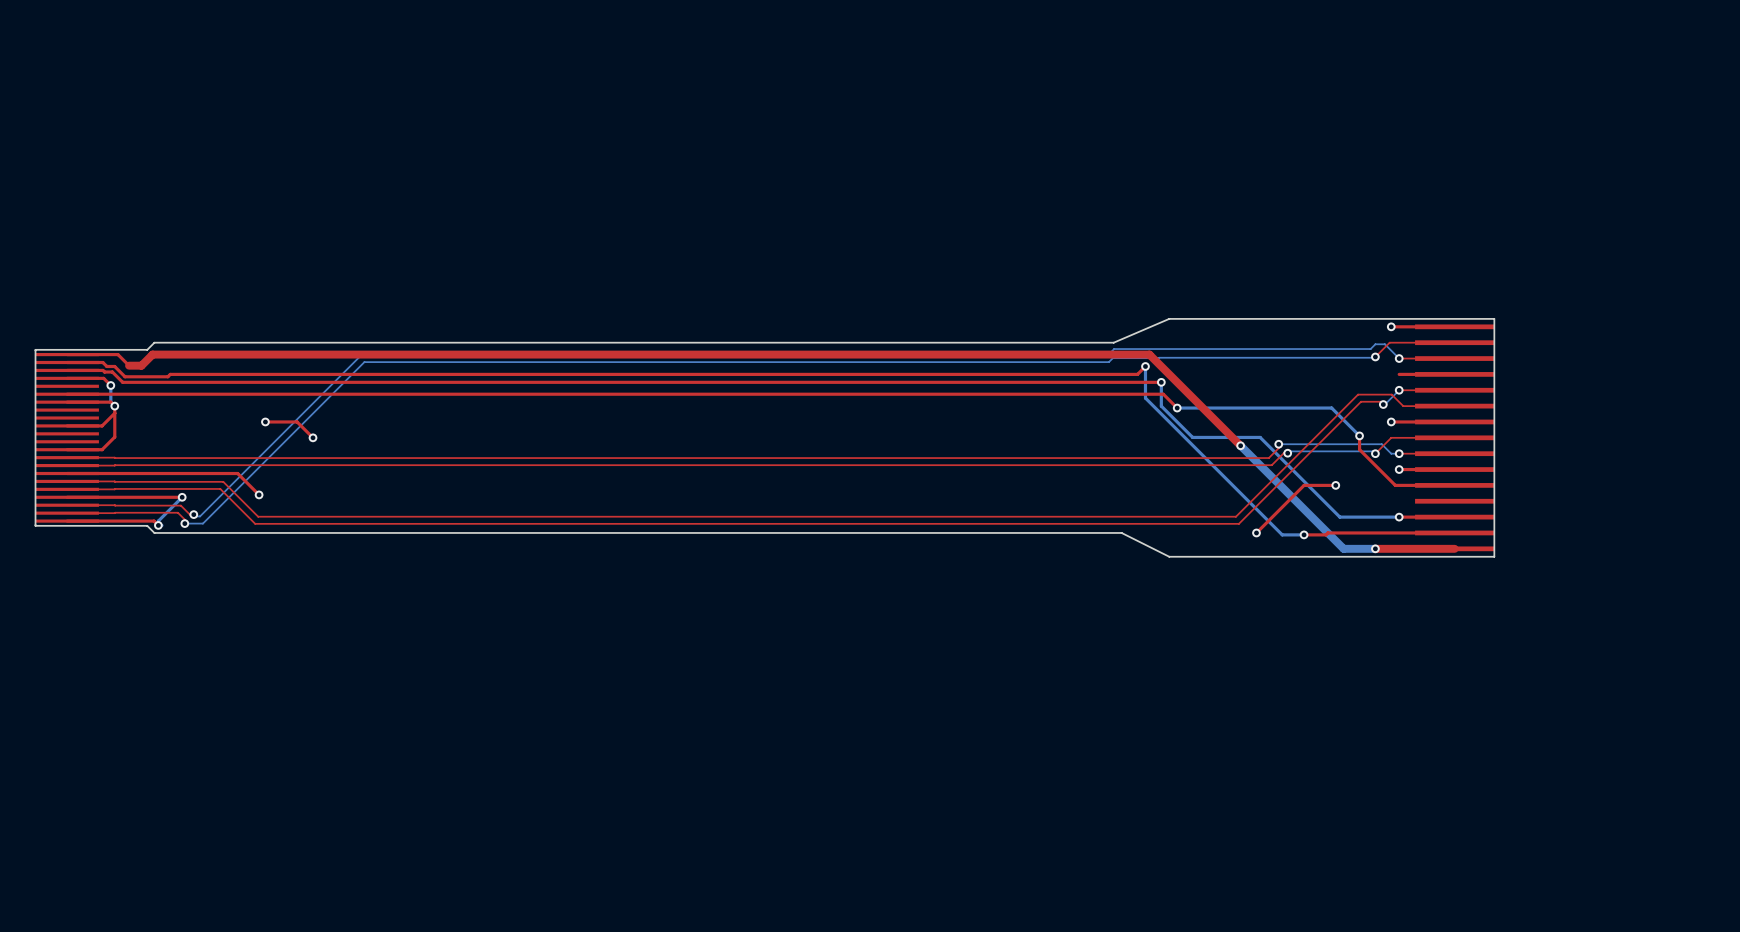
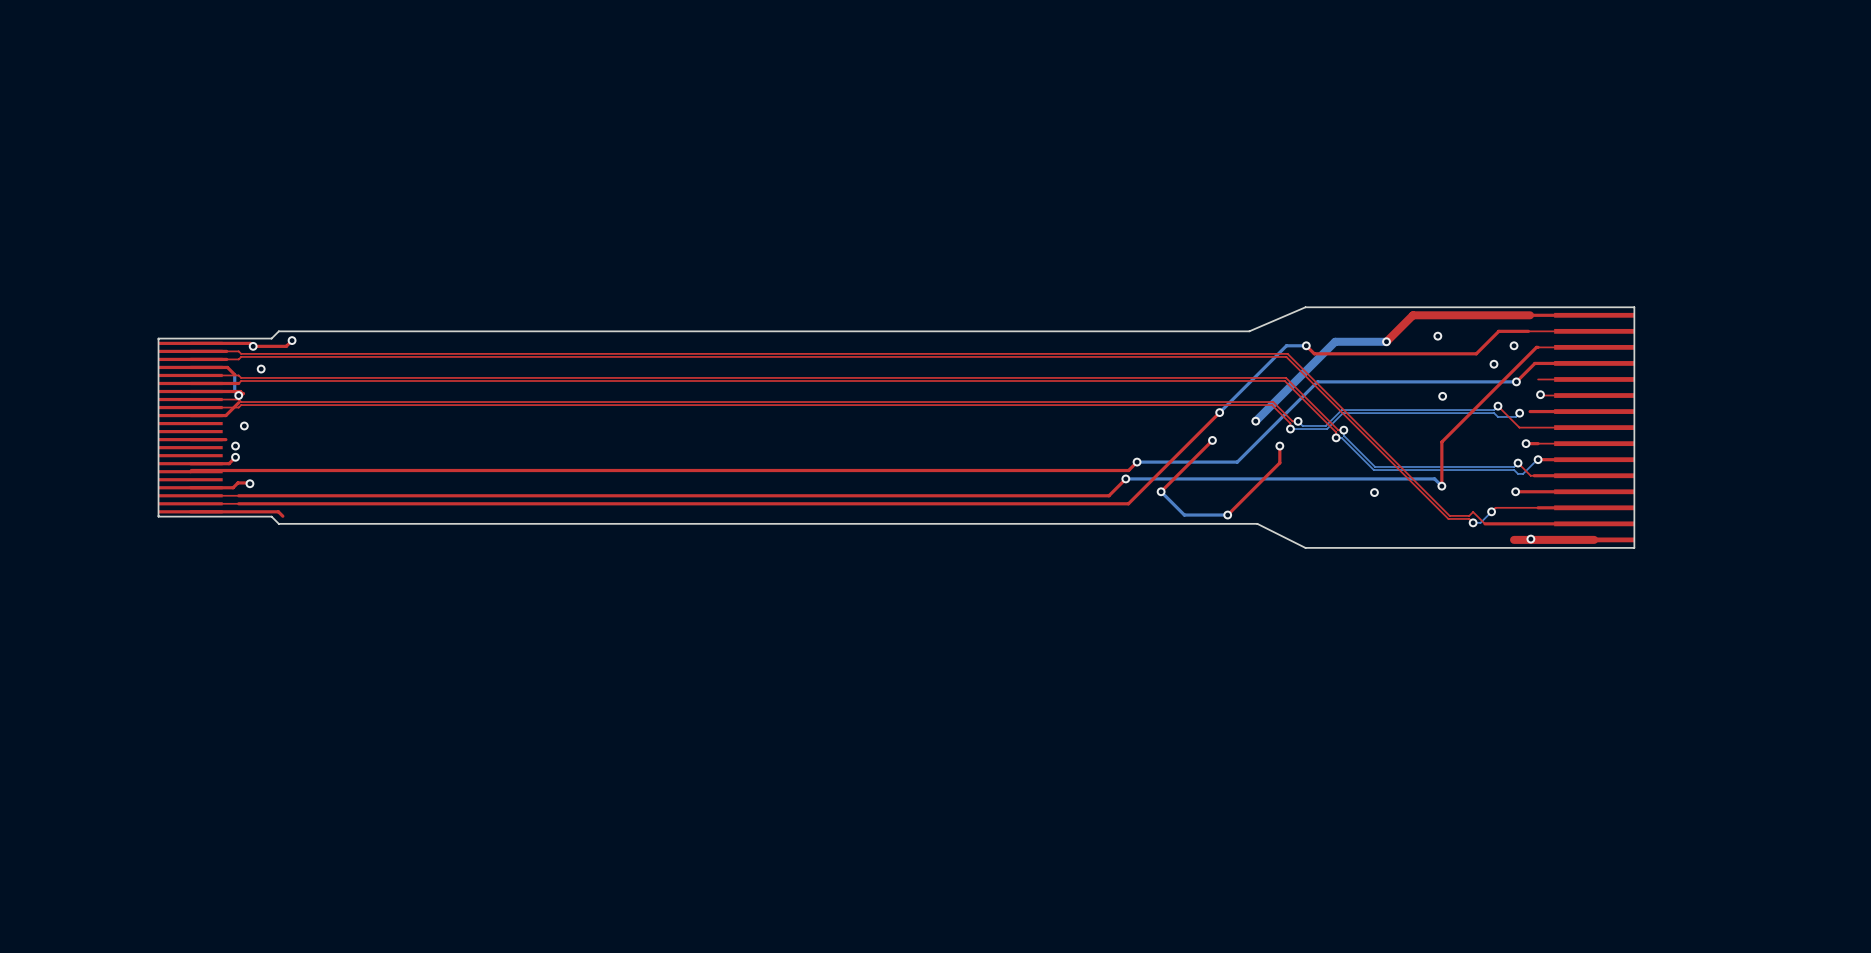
top track: none -> (1530, 315) (1412, 315) (1386, 341)
via: (1391, 326) -> none
top track: (1389, 342) (1375, 356) -> (1528, 331) (1498, 331) (1476, 353) (1314, 353) (1306, 345)
via: none -> (1437, 336)
via: none -> (292, 340)
bottom track: none -> (1386, 341) (1335, 341) (1255, 421)
via: none -> (1386, 341)
top track: (117, 354) (129, 365) (141, 365) (152, 354) (1149, 354) (1240, 445) -> (241, 343) (250, 343) (253, 346) (286, 346) (292, 340)
bottom track: none -> (1306, 345) (1286, 345) (1219, 412)
via: none -> (1306, 345)
bottom track: (1375, 356) (1112, 358) (1108, 362) (364, 362) (202, 523) (184, 523) -> none
via: none -> (253, 346)
top track: none -> (1538, 347) (1441, 442) (1441, 486)
bottom track: (1399, 358) (1384, 344) (1375, 344) (1370, 349) (1114, 349) (1106, 356) (359, 356) (200, 516) (193, 514) -> none
via: (1399, 358) -> none
top track: (102, 362) (106, 366) (114, 366) (125, 376) (167, 376) (170, 374) (1137, 374) (1145, 366) -> (226, 351) (238, 351) (241, 353) (1287, 353) (1449, 515) (1469, 515) (1473, 512) (1484, 523)
bottom track: (1145, 366) (1145, 398) (1282, 534) (1304, 534) -> none
via: (1145, 366) -> none
top track: (102, 370) (112, 372) (122, 382) (1161, 382) -> (226, 359) (238, 359) (241, 356) (1286, 356) (1448, 518) (1469, 518) (1473, 522)
top track: none -> (1538, 363) (1534, 363) (1516, 381)
via: none -> (1493, 364)
via: none -> (261, 369)
bottom track: (1161, 382) (1161, 406) (1192, 437) (1260, 437) (1339, 517) (1399, 517) -> none
via: (1161, 382) -> none
via: (110, 385) -> none
top track: none -> (190, 375) (238, 375) (241, 377) (1286, 377) (1338, 430) (1343, 430)
bottom track: (1399, 390) (1383, 404) -> none
via: (1399, 390) -> none
bottom track: none -> (1516, 381) (1317, 381) (1237, 462) (1137, 462)
via: none -> (1516, 381)
top track: (114, 394) (1163, 394) (1177, 408) -> (238, 383) (241, 381) (1284, 381) (1336, 432) (1336, 437)
top track: (110, 402) (114, 406) (114, 437) (102, 449) -> (234, 391) (243, 393)
top track: (1383, 404) (1380, 401) (1361, 401) (1238, 523) (255, 523) (220, 488) (67, 489) -> none
via: (1383, 404) -> none
via: none -> (1540, 394)
via: none -> (1442, 396)
top track: (1403, 406) (1391, 394) (1358, 394) (1235, 516) (258, 516) (223, 481) (67, 481) -> (1137, 462) (1128, 470) (190, 471)
bottom track: (1177, 408) (1331, 408) (1359, 435) -> none
via: (1177, 408) -> none
top track: none -> (190, 399) (238, 399) (241, 402) (1273, 402) (1292, 421) (1298, 421)
bottom track: none -> (1498, 406) (1494, 410) (1341, 410) (1325, 425) (1302, 425) (1298, 421)
via: none -> (1498, 406)
top track: none -> (190, 407) (238, 407) (241, 405) (1271, 405) (1290, 423) (1290, 429)
top track: (265, 421) (297, 421) (313, 437) -> none
via: (265, 421) -> none
via: (1391, 421) -> none
via: none -> (1219, 412)
bottom track: none -> (1519, 413) (1515, 416) (1498, 416) (1494, 413) (1343, 413) (1327, 429) (1290, 429)
via: none -> (1519, 413)
via: none -> (1255, 421)
via: none -> (1298, 421)
top track: (1359, 435) (1359, 449) (1395, 485) -> (1518, 463) (1530, 475) (1534, 475)
via: (1359, 435) -> none
via: none -> (244, 425)
via: (313, 437) -> none
top track: (1391, 437) (1375, 453) -> (1530, 427) (1519, 427) (1498, 406)
via: none -> (1290, 429)
bottom track: none -> (1343, 430) (1343, 435) (1375, 466) (1514, 466) (1518, 463)
via: none -> (1343, 430)
top track: (1278, 444) (1278, 448) (1268, 458) (67, 457) -> none
bottom track: (1278, 444) (1381, 444) (1391, 453) (1399, 453) -> none
via: (1278, 444) -> none
bottom track: (1240, 445) (1343, 548) (1375, 548) -> none
via: (1240, 445) -> none
bottom track: none -> (1336, 437) (1341, 437) (1373, 470) (1514, 470) (1518, 473) (1523, 473) (1534, 462)
via: none -> (1336, 437)
top track: none -> (1212, 440) (1161, 491)
via: none -> (1212, 440)
top track: (1287, 453) (1283, 453) (1271, 465) (67, 465) -> none
bottom track: (1287, 453) (1289, 451) (1373, 451) (1375, 453) -> none
via: (1287, 453) -> none
via: (1375, 453) -> none
top track: none -> (1526, 443) (1538, 443)
via: none -> (1526, 443)
via: (1399, 453) -> none
via: none -> (235, 446)
top track: none -> (1279, 446) (1279, 462) (1227, 515)
via: none -> (1279, 446)
via: none -> (235, 457)
via: none -> (1137, 462)
via: none -> (1518, 463)
top track: (105, 473) (237, 473) (259, 494) -> (229, 463) (235, 457)
top track: (1335, 485) (1304, 485) (1256, 532) -> none
via: (1335, 485) -> none
bottom track: none -> (1125, 478) (1434, 478) (1441, 486)
via: none -> (1125, 478)
via: none -> (249, 483)
via: (259, 494) -> none
via: none -> (1441, 486)
top track: (109, 497) (182, 497) -> (233, 487) (237, 482) (249, 483)
bottom track: (182, 497) (158, 521) (158, 525) (161, 525) -> none
via: (182, 497) -> none
bottom track: none -> (1161, 491) (1184, 515) (1227, 515)
via: none -> (1161, 491)
top track: none -> (1515, 491) (1594, 491)
via: none -> (1515, 491)
via: none -> (1374, 492)
top track: (114, 505) (180, 505) (189, 514) (193, 514) -> (238, 495) (1108, 495) (1125, 478)
top track: (114, 513) (177, 512) (184, 519) (184, 523) -> (238, 503) (1128, 503) (1219, 412)
via: (193, 514) -> none
top track: none -> (1538, 507) (1495, 507) (1491, 511)
via: (1399, 517) -> none
bottom track: none -> (1491, 511) (1480, 522) (1473, 522)
via: none -> (1491, 511)
via: (184, 523) -> none
via: none -> (1227, 515)
via: (158, 525) -> none
via: none -> (1473, 522)
via: (1256, 532) -> none
top track: (1346, 532) (1304, 534) -> none
via: (1304, 534) -> none
via: (1375, 548) -> none
via: none -> (1530, 539)

